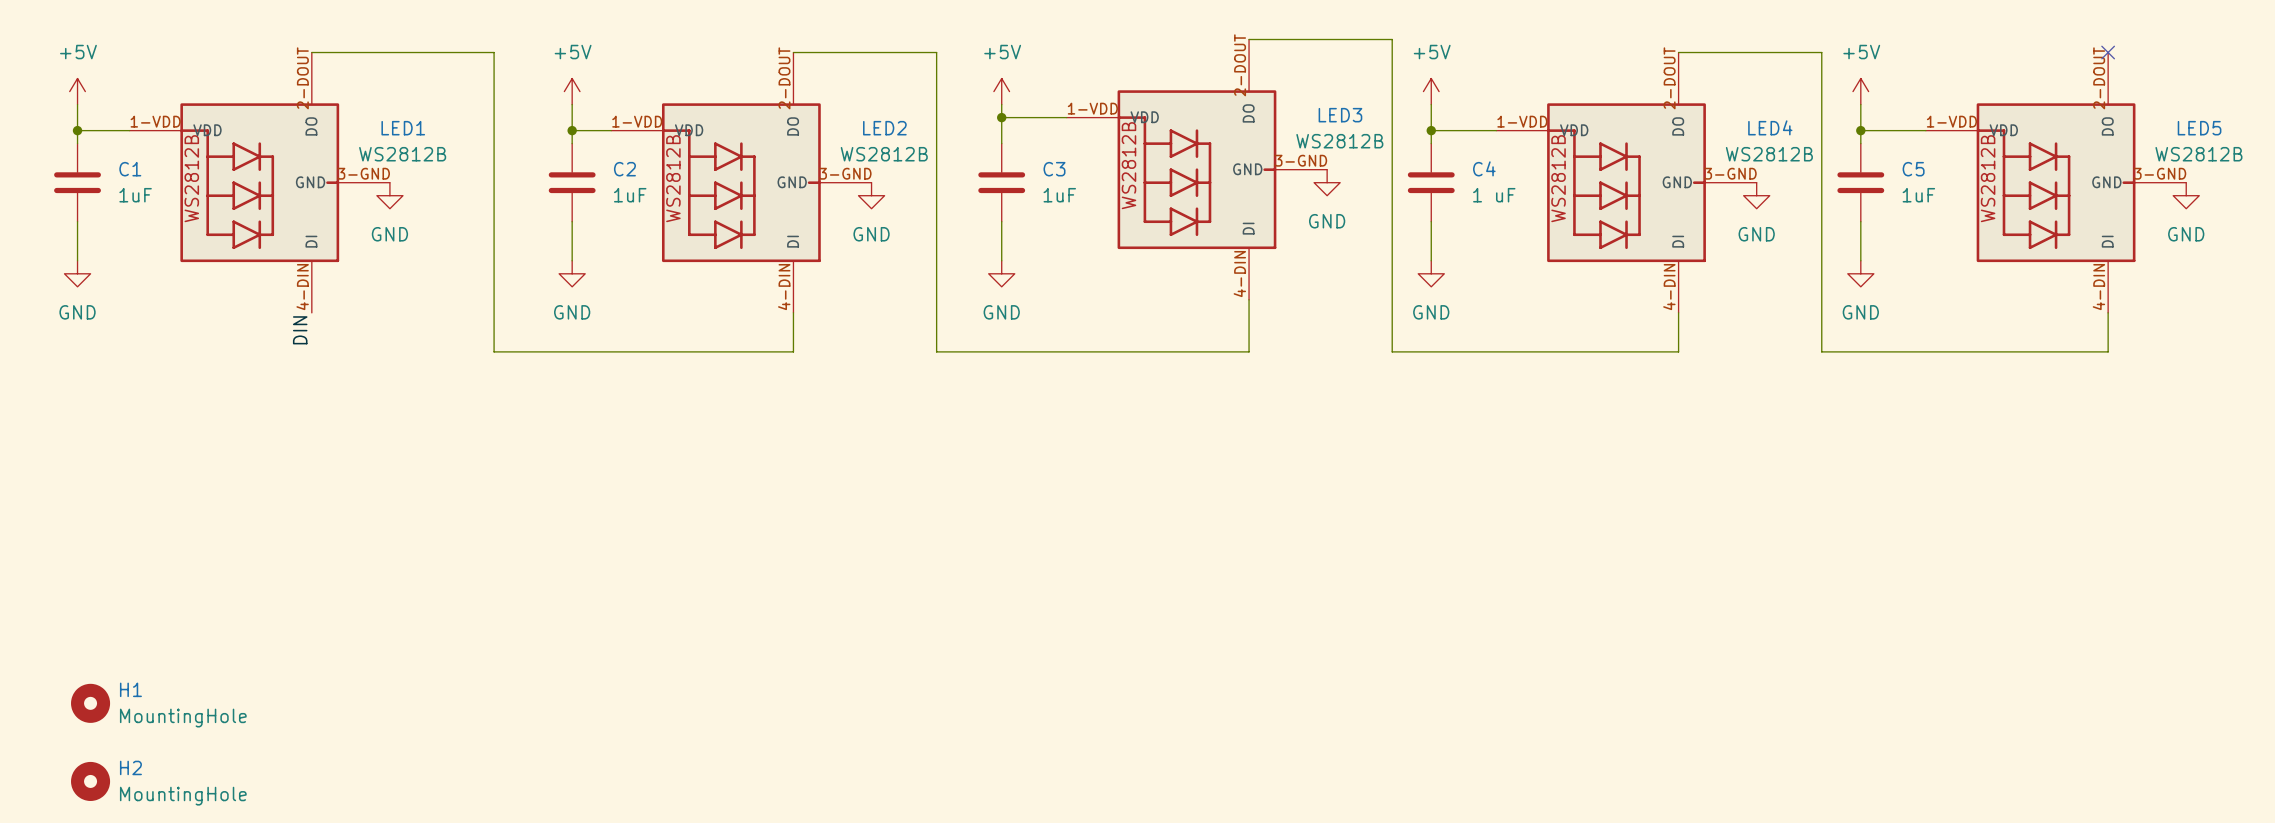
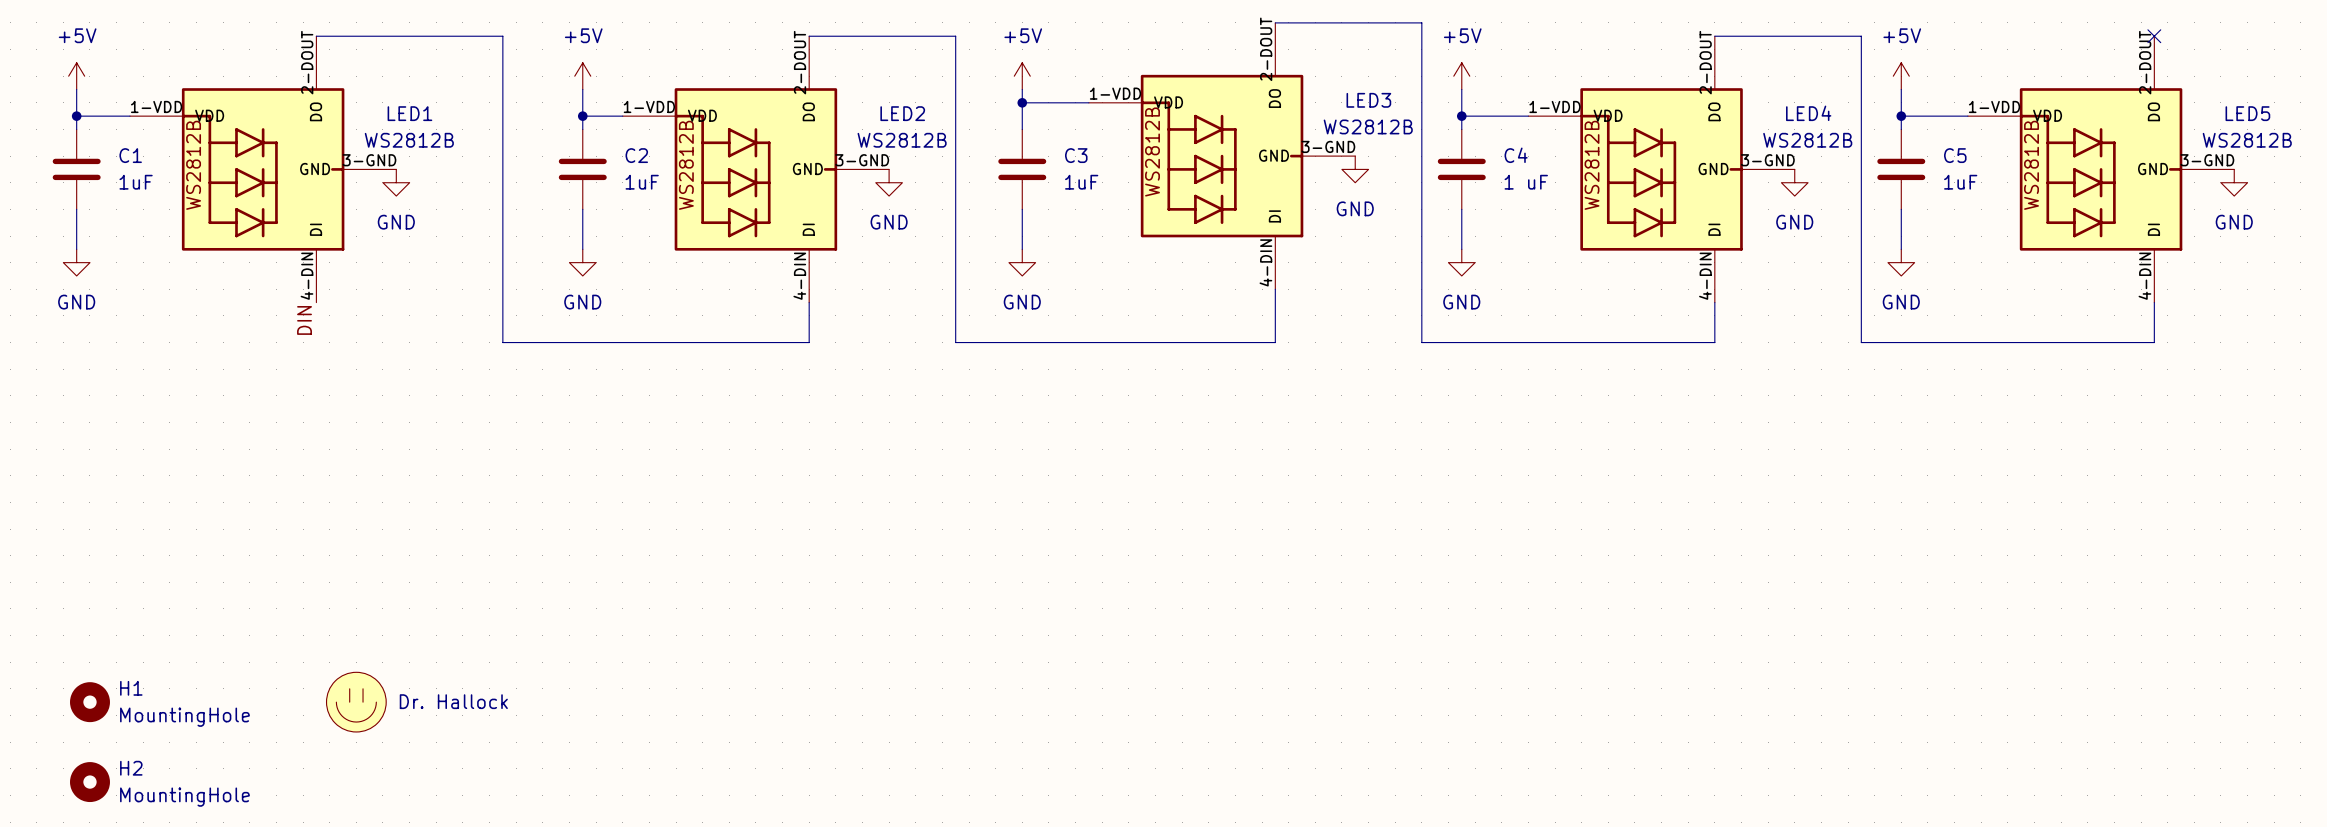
part: none -> Dr. Hallock (356, 702)

